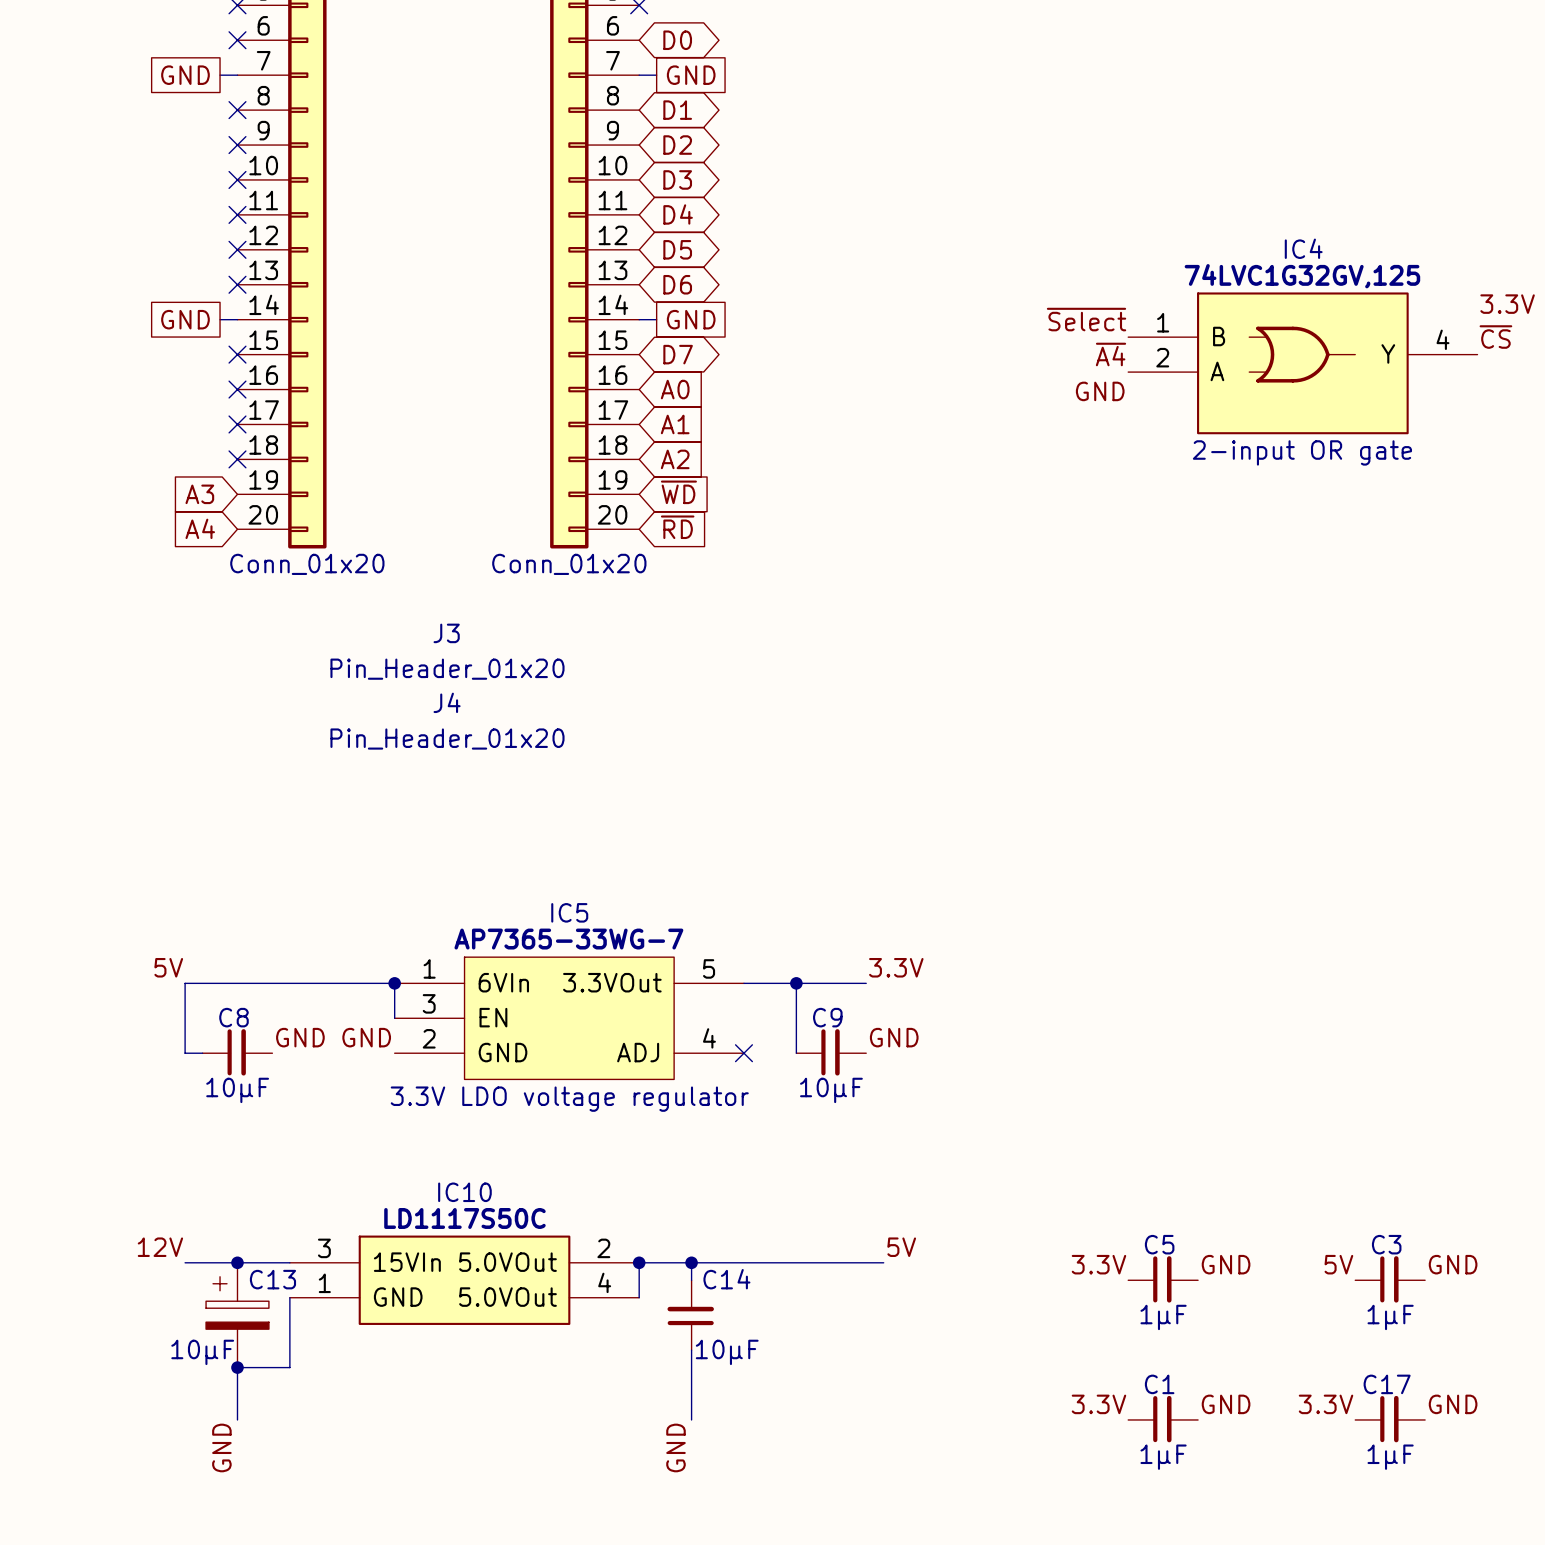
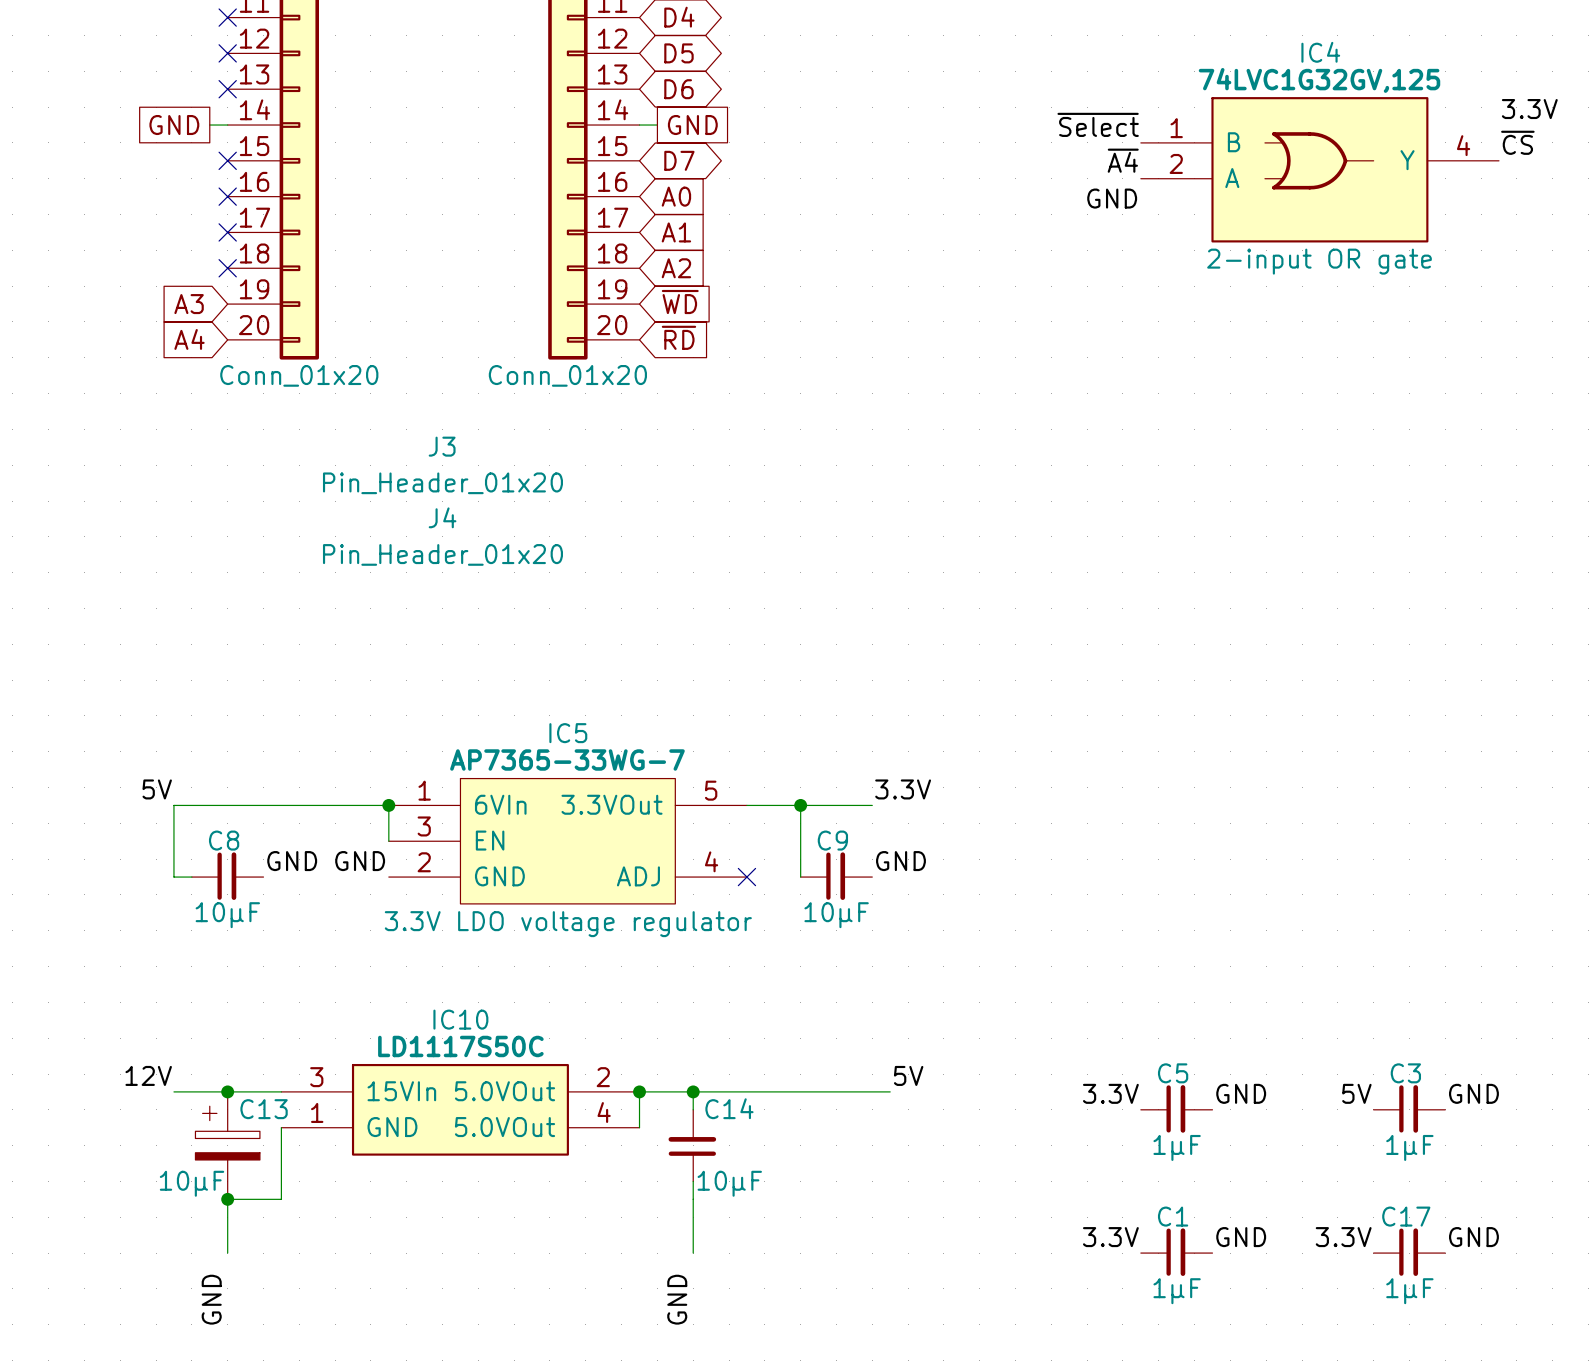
label position: GND (221, 1447) -> GND (211, 1299)
label position: GND (675, 1447) -> GND (677, 1299)

